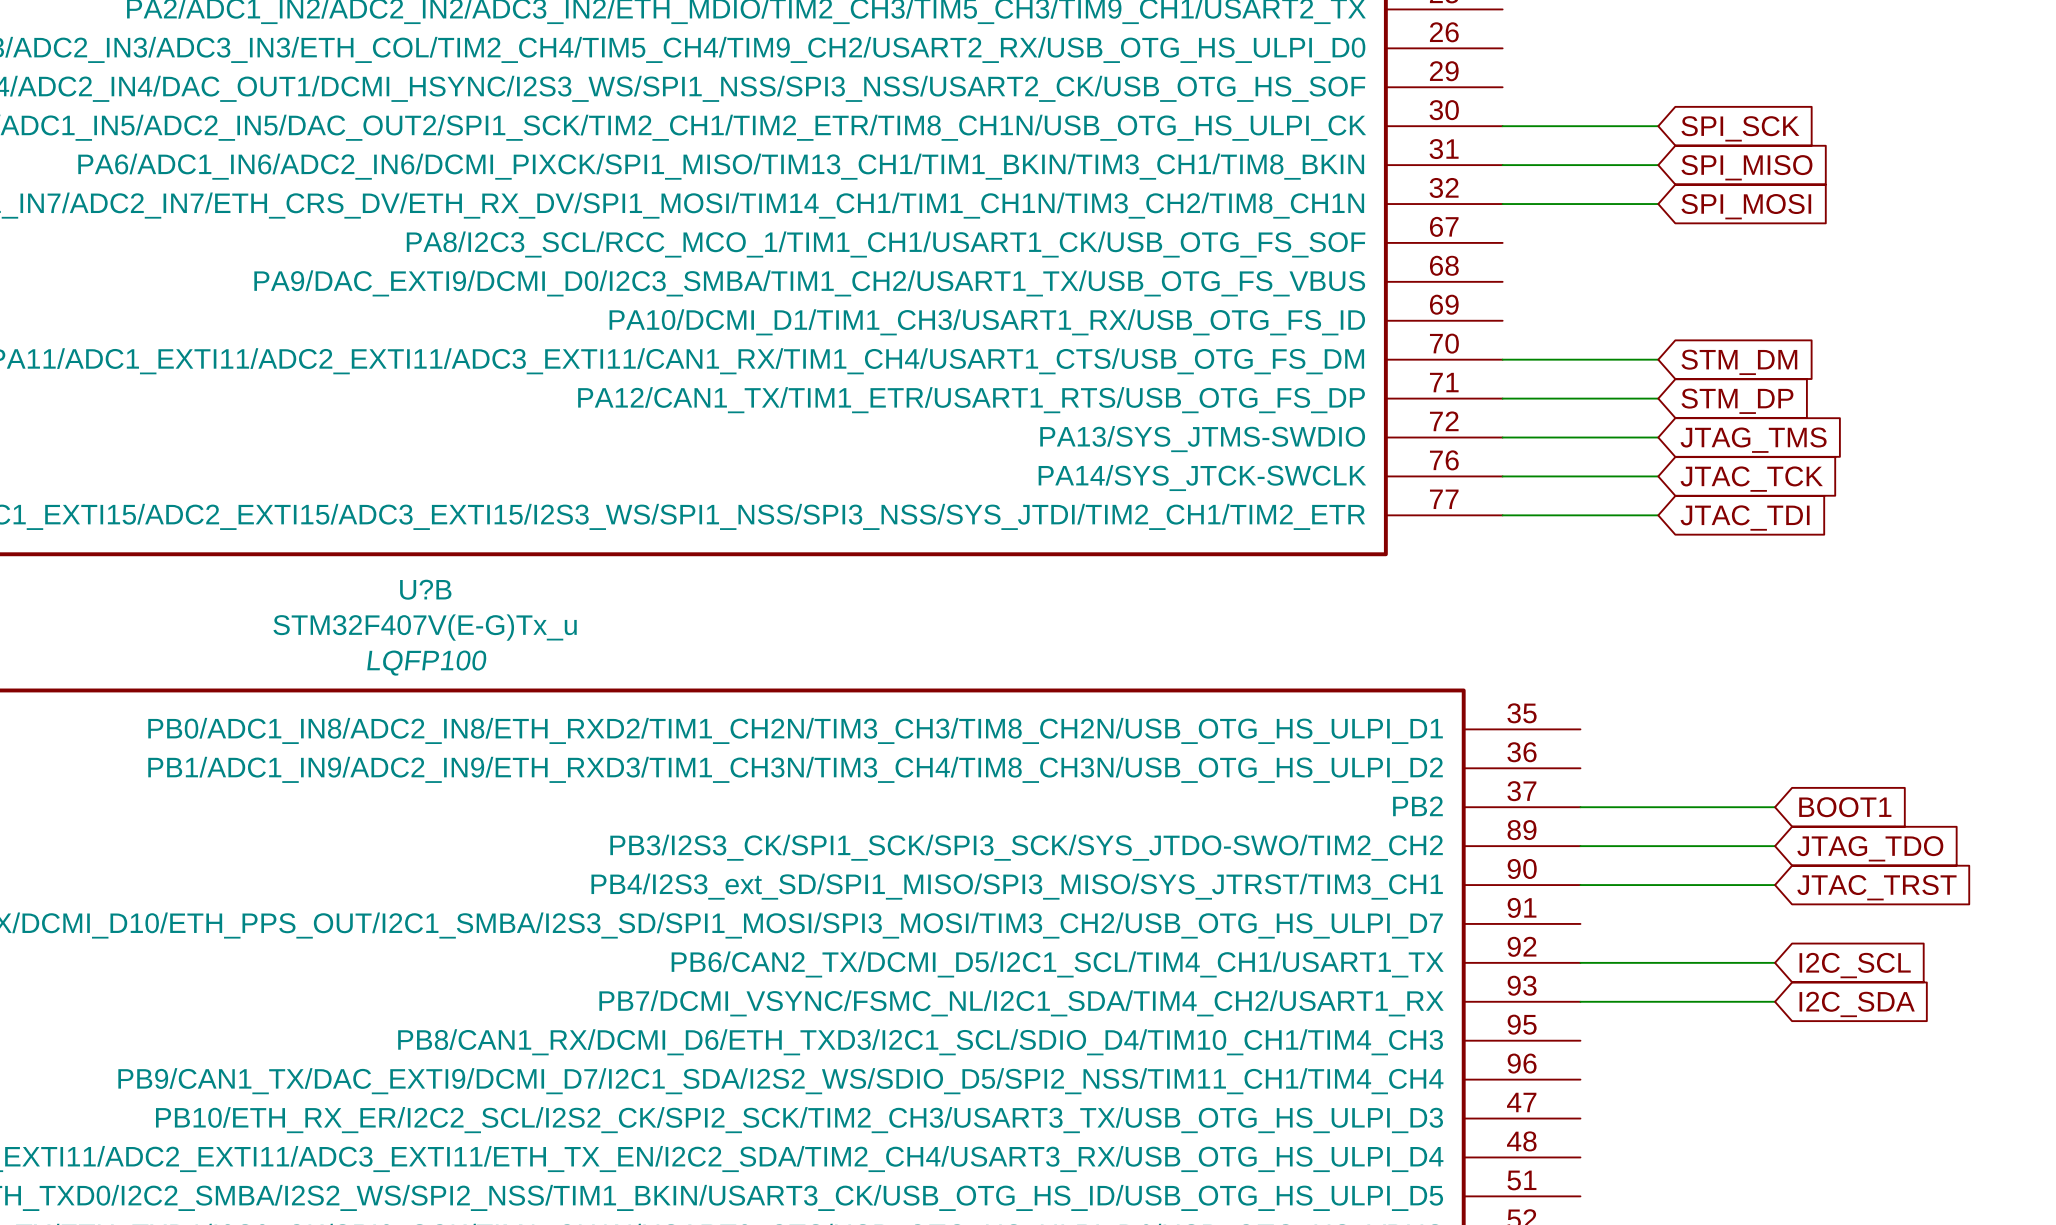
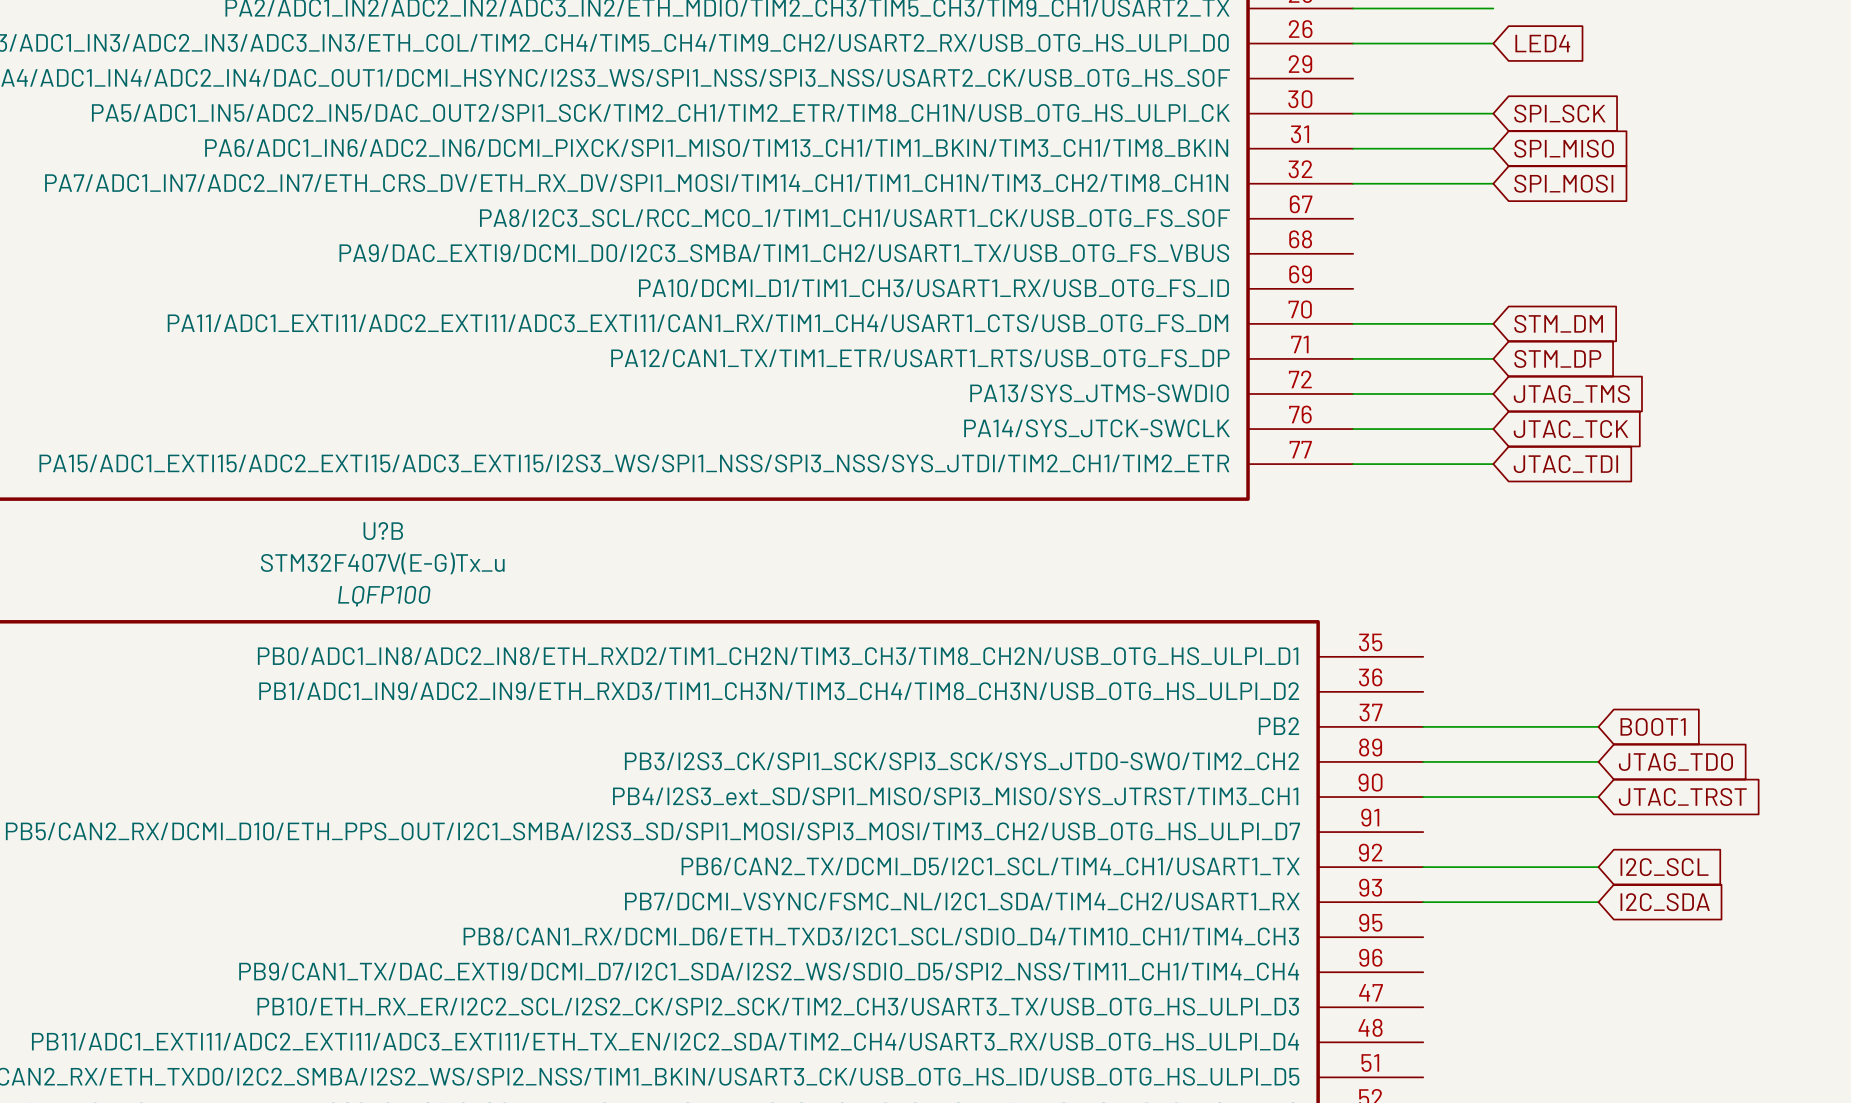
wire: none -> (1353, 8) (1493, 8)
wire: none -> (1353, 43) (1493, 43)
global label: none -> LED4 (1542, 43)

